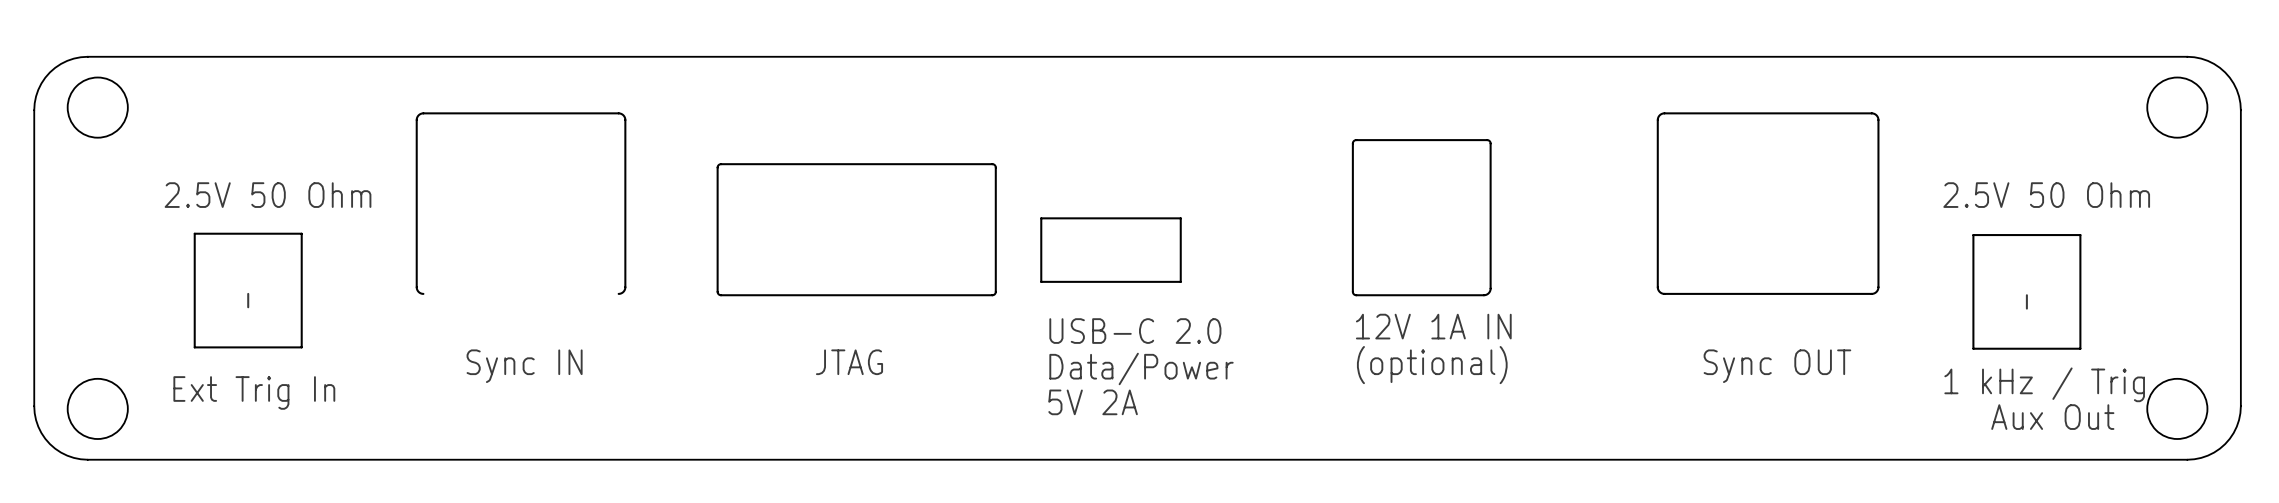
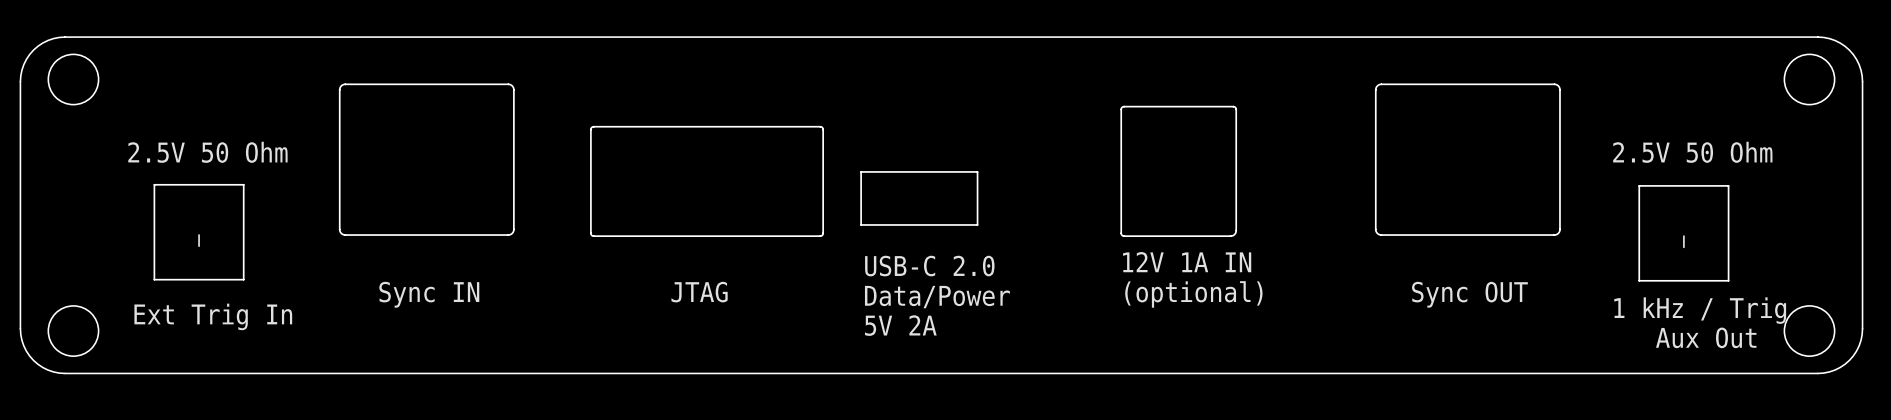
board edge: none -> (345, 235) (508, 235)

